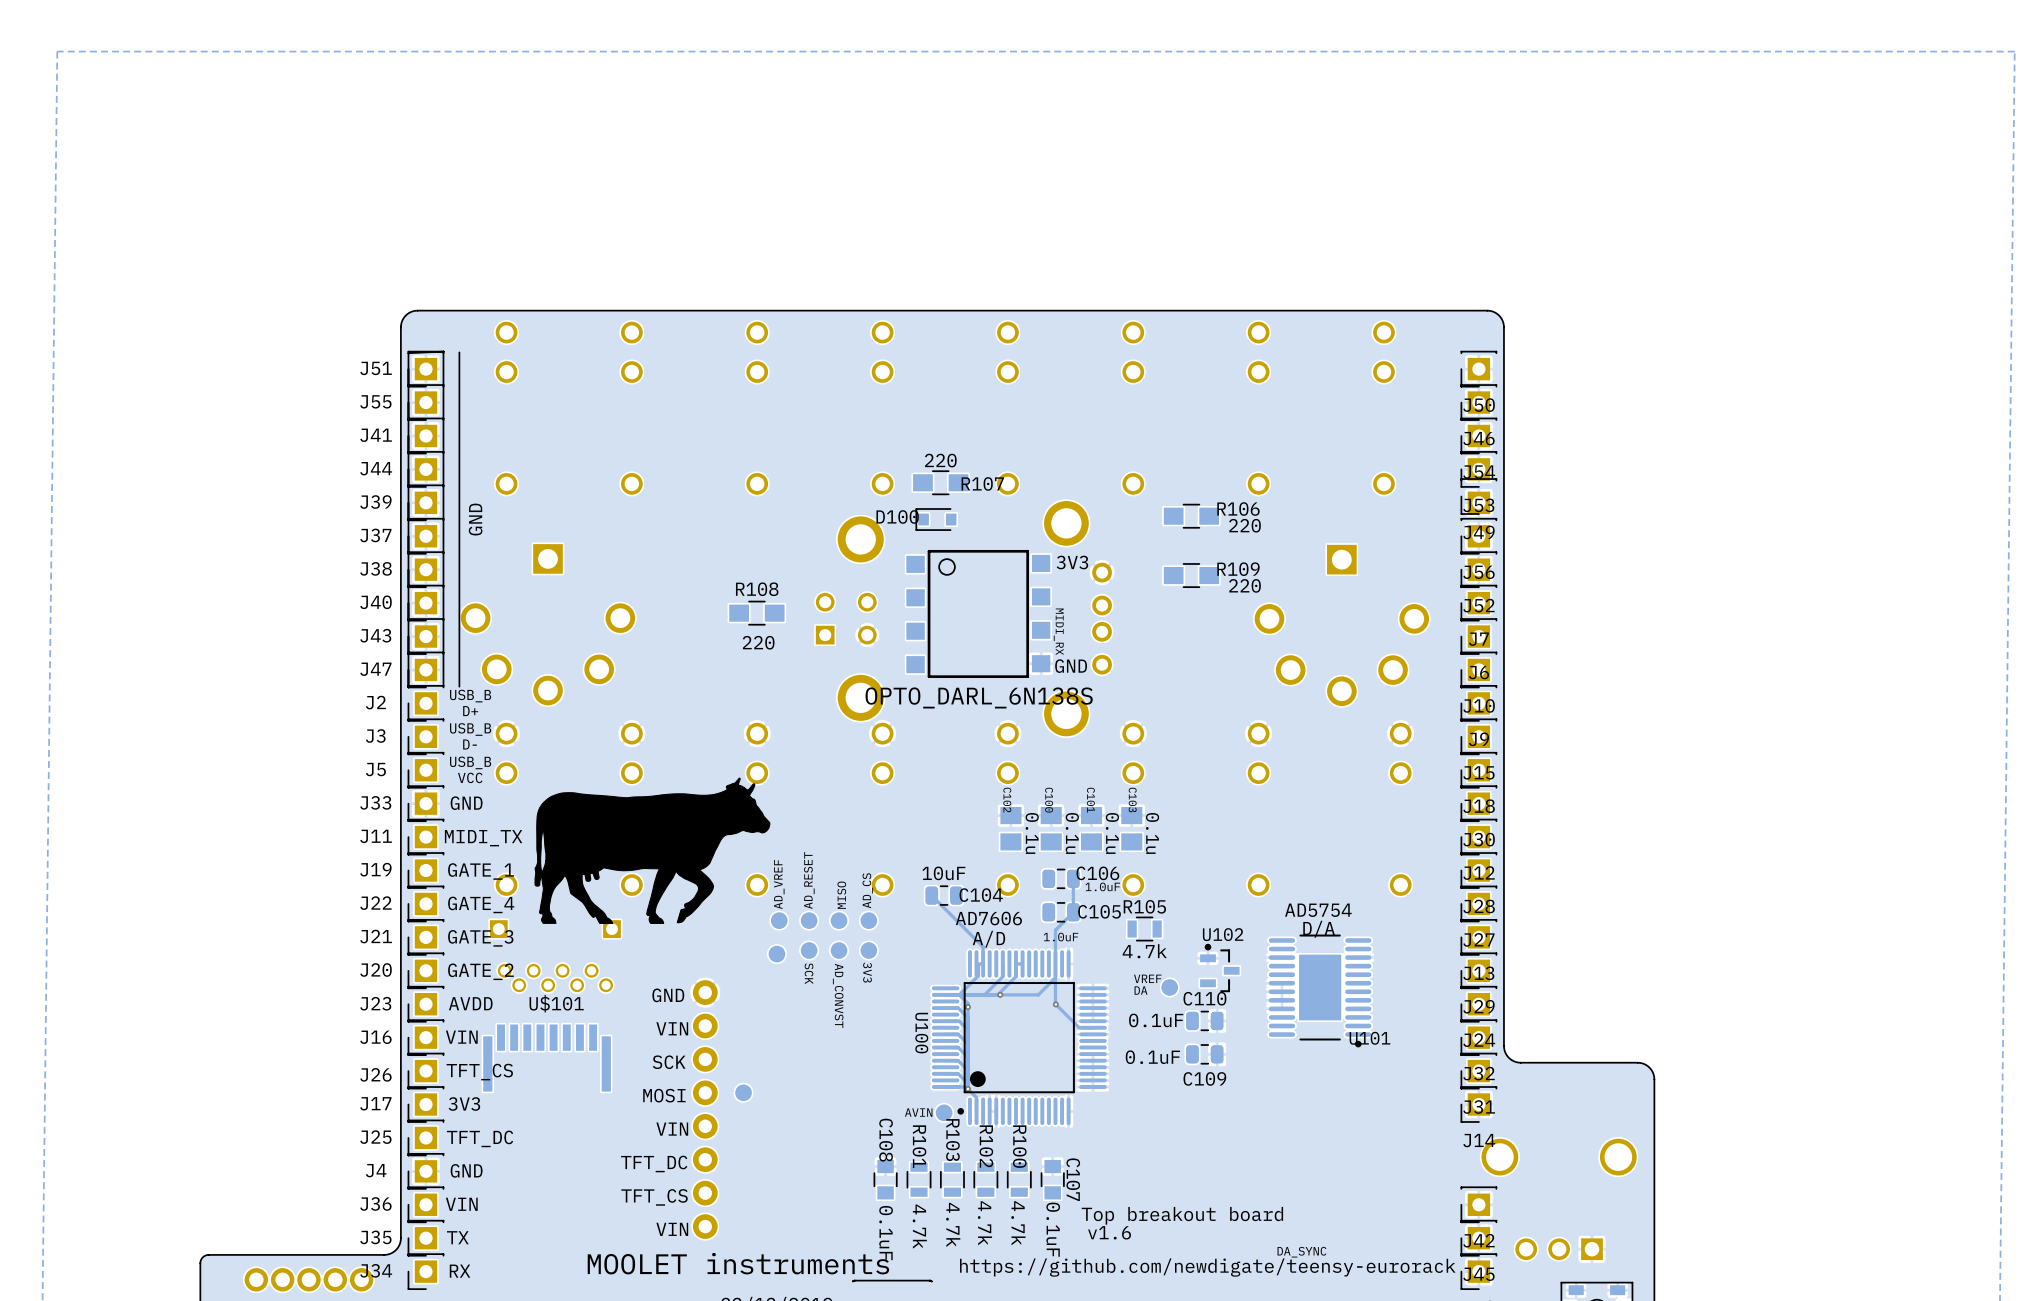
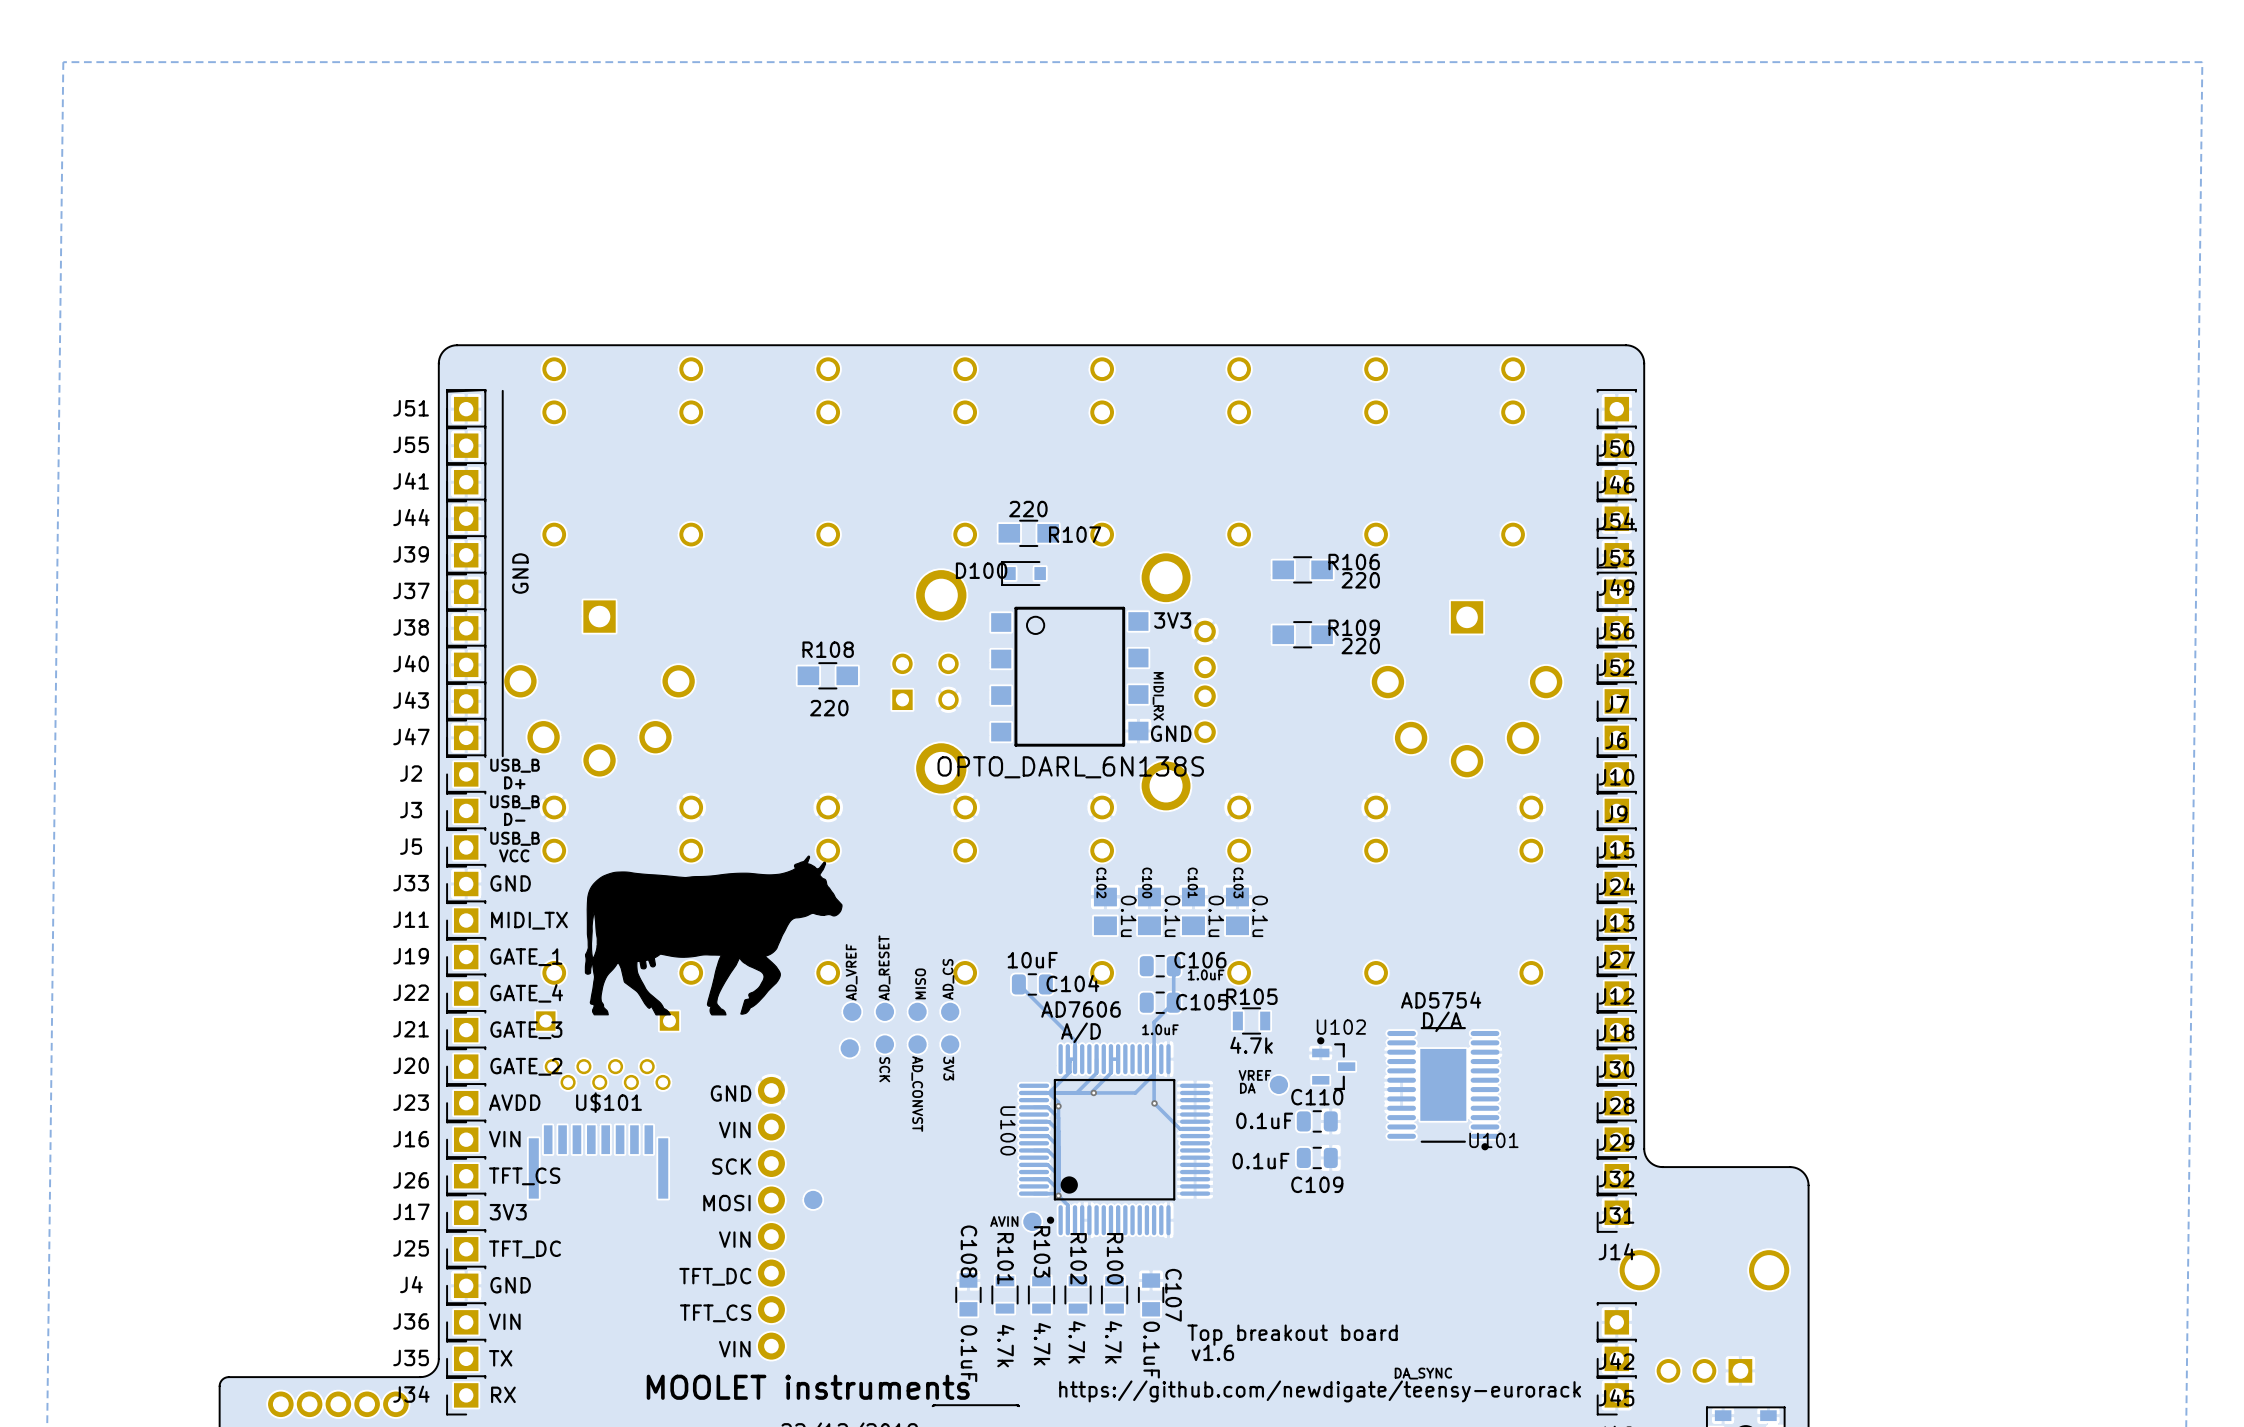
J18 name: J18 (1479, 806) -> J24 (1616, 886)
J30 name: J30 (1479, 839) -> J13 (1616, 923)
J12 name: J12 (1479, 873) -> J27 (1616, 959)
J28 name: J28 (1479, 906) -> J12 (1616, 996)
J27 name: J27 (1478, 939) -> J18 (1616, 1032)
J13 name: J13 (1478, 973) -> J30 (1616, 1069)
J29 name: J29 (1478, 1006) -> J28 (1616, 1105)
J24 name: J24 (1479, 1040) -> J29 (1616, 1142)

